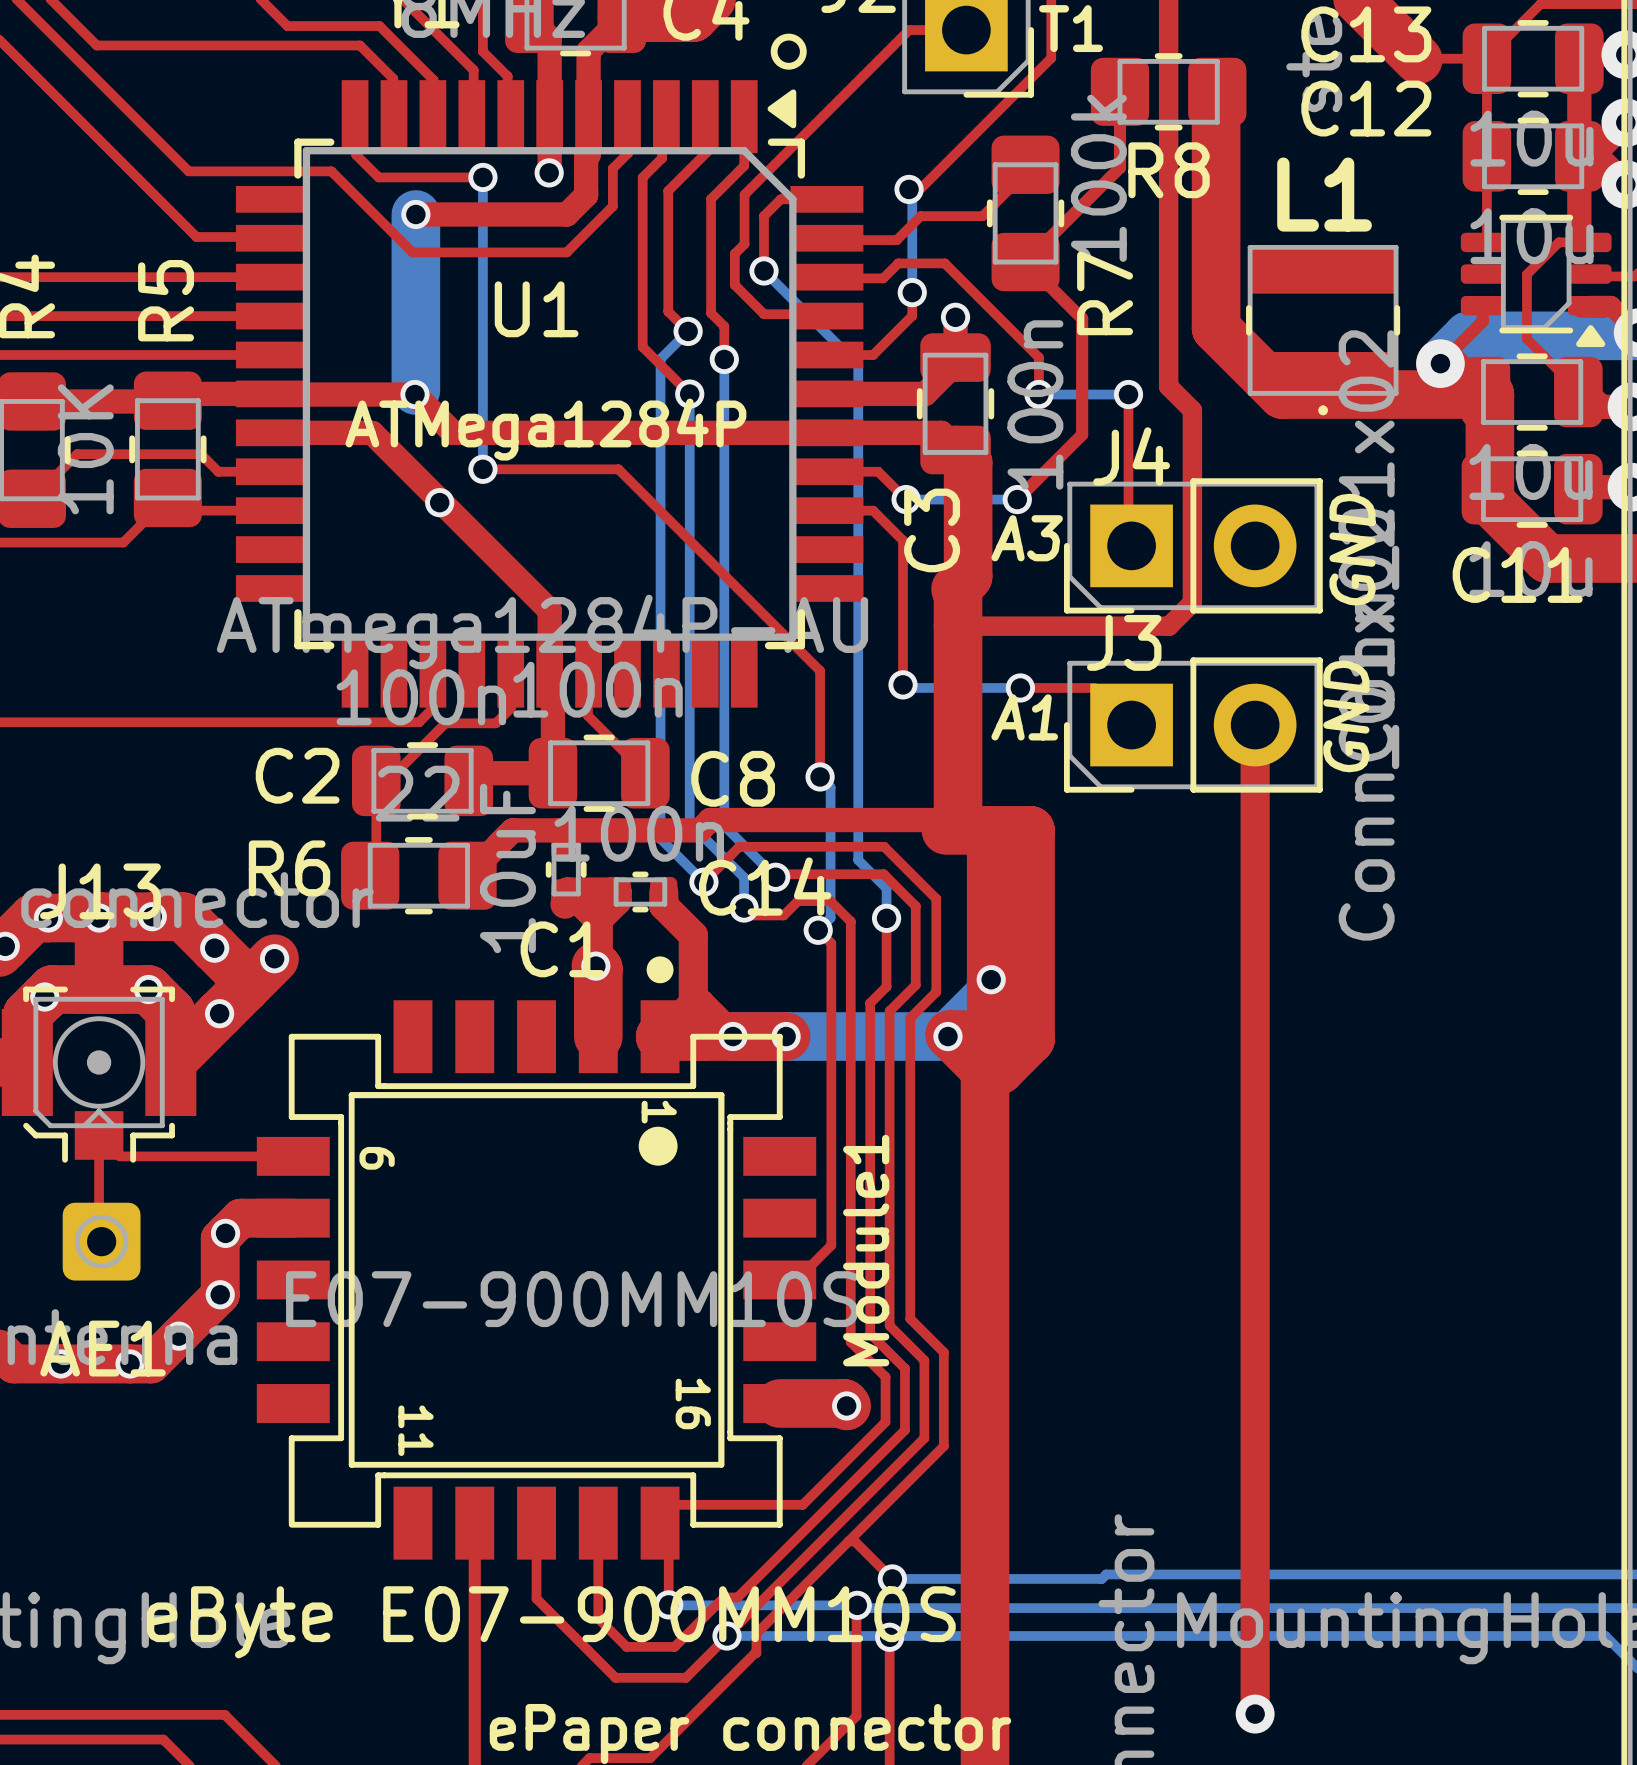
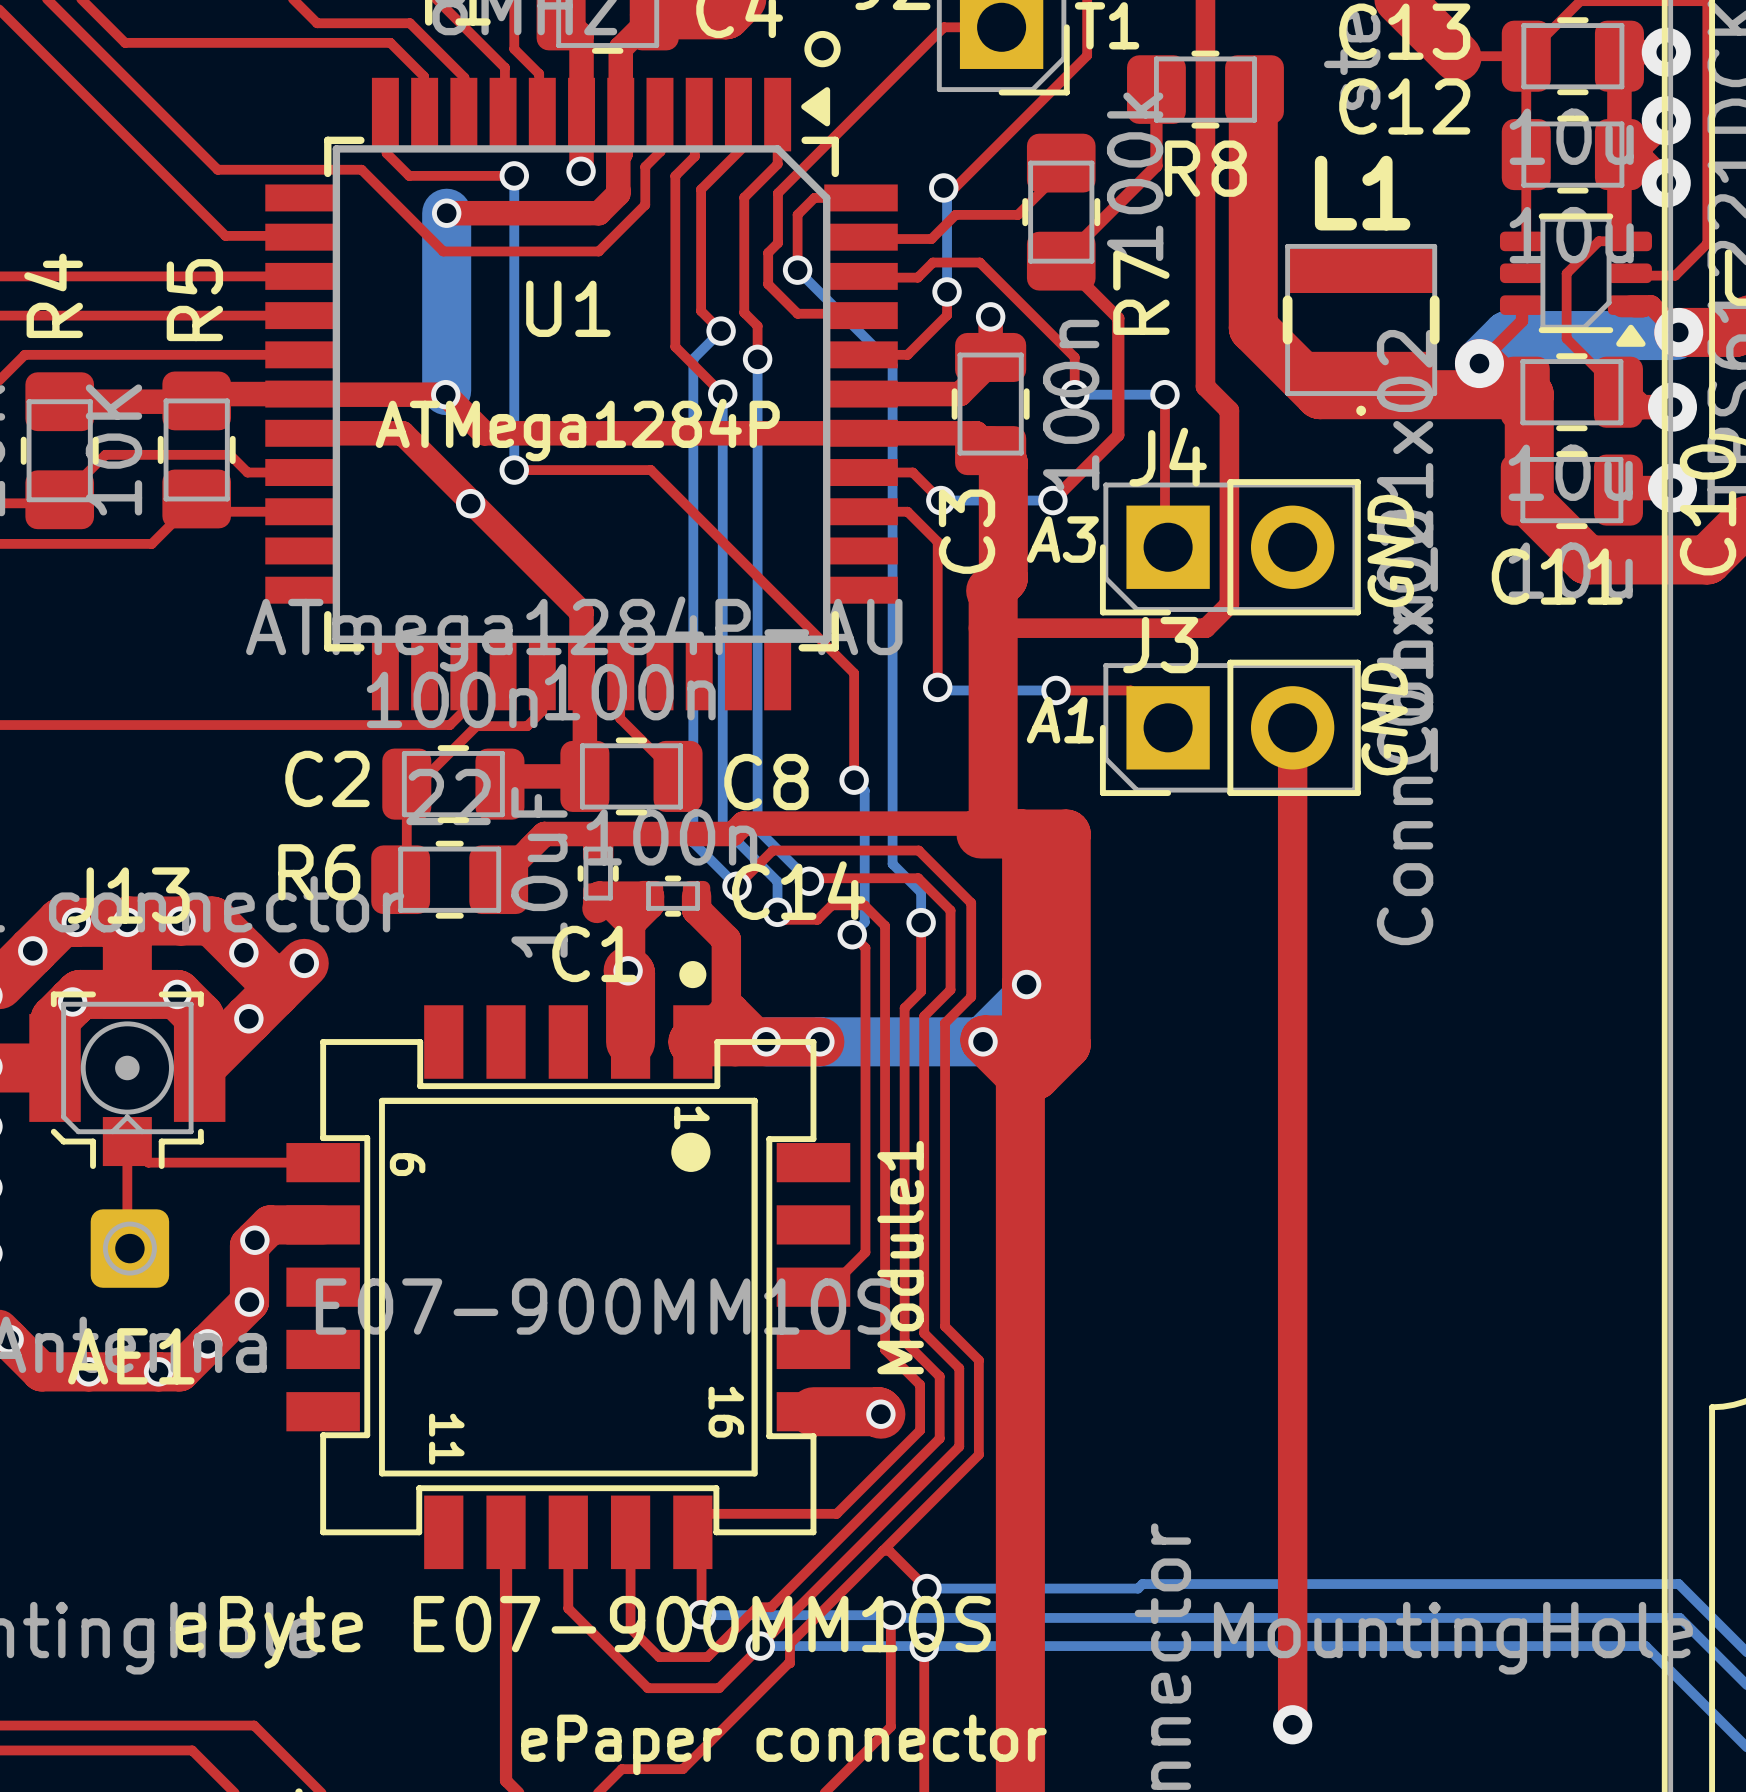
L1 footprint: [1246, 245, 1401, 416] -> [1282, 243, 1440, 416]
Module1 footprint: [256, 1000, 817, 1560] -> [286, 1005, 851, 1570]

